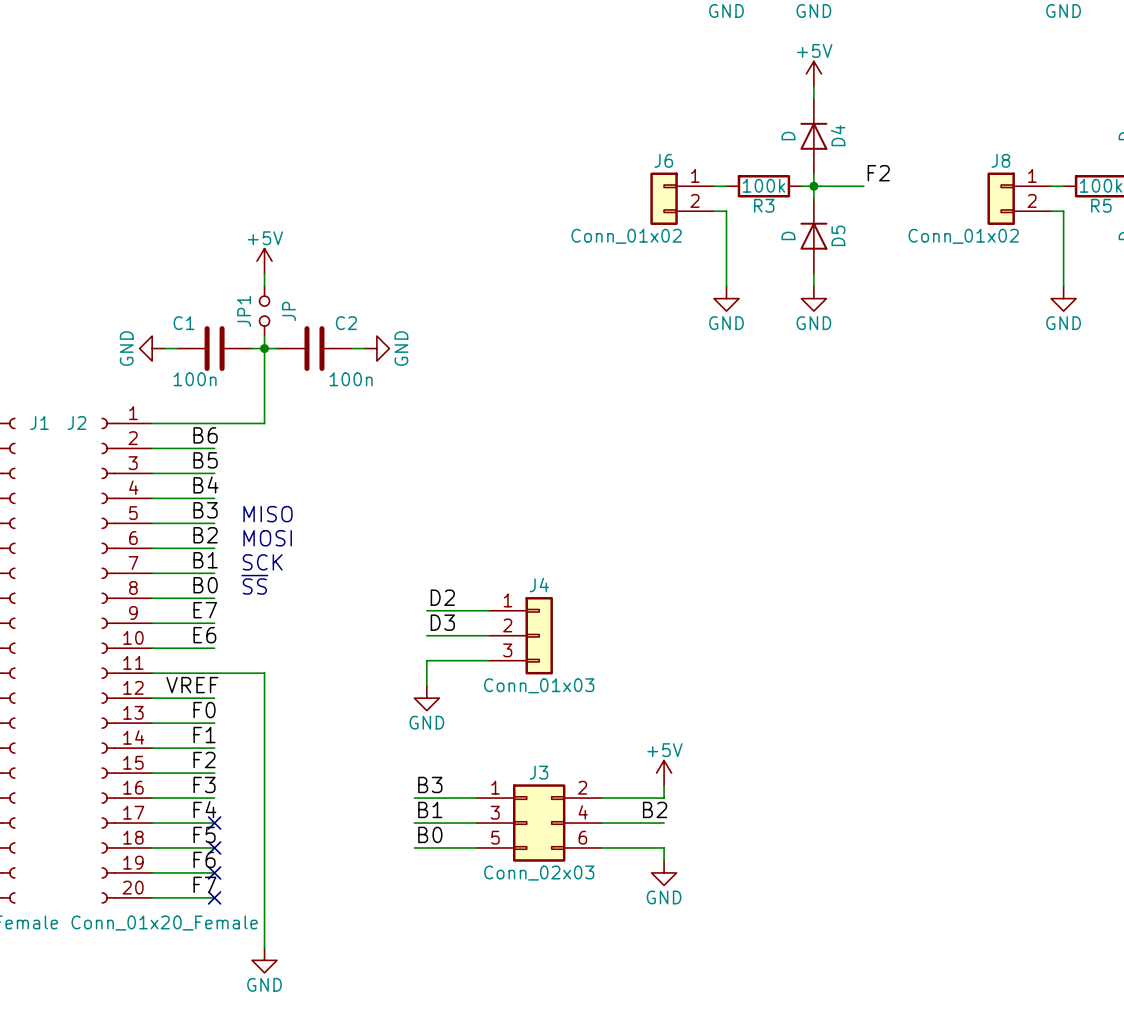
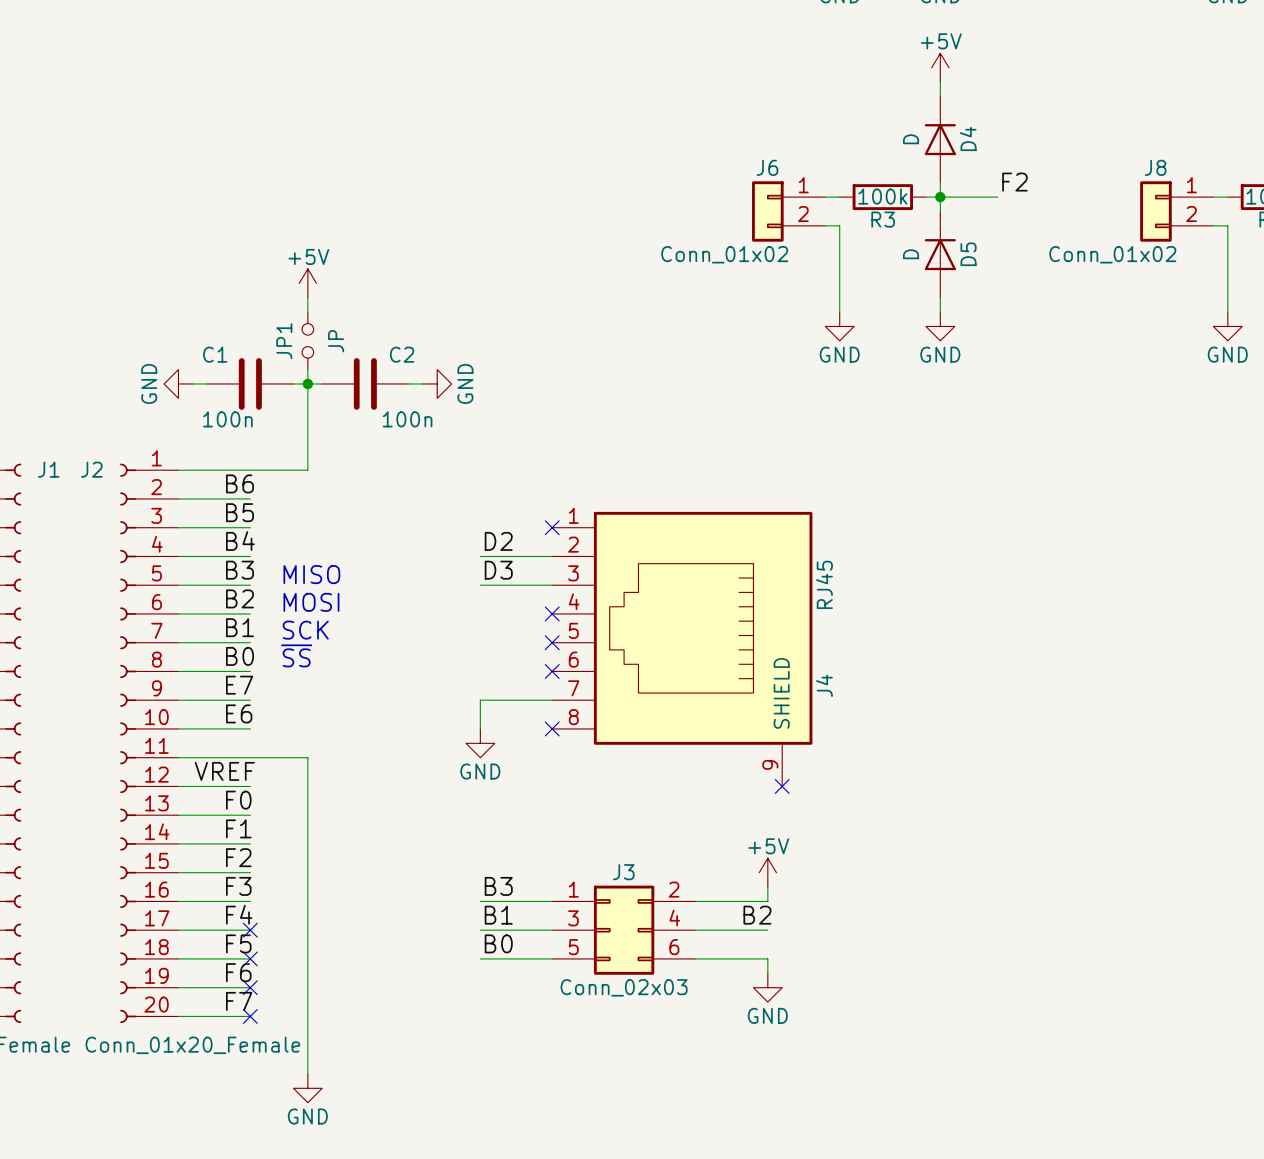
no-connect mark: none -> (552, 527)
no-connect mark: none -> (552, 613)
no-connect mark: none -> (552, 642)
J4 name position: J4 (539, 585) -> J4 (824, 685)
label position: D2 (442, 597) -> D2 (498, 541)
J4 symbol: [489, 597, 553, 675] -> [552, 511, 813, 787]
no-connect mark: none -> (552, 671)
wire: (426, 610) (489, 610) -> (480, 556) (552, 556)
label position: D3 (442, 622) -> D3 (498, 570)
wire: (426, 635) (489, 635) -> (480, 585) (552, 585)
no-connect mark: none -> (552, 728)
wire: (489, 660) (426, 660) (426, 685) -> (552, 700) (480, 700) (480, 728)
J4 value: Conn_01x03 (539, 685) -> RJ45 (824, 584)
power symbol position: GND (426, 698) -> GND (480, 743)
no-connect mark: none -> (782, 786)

